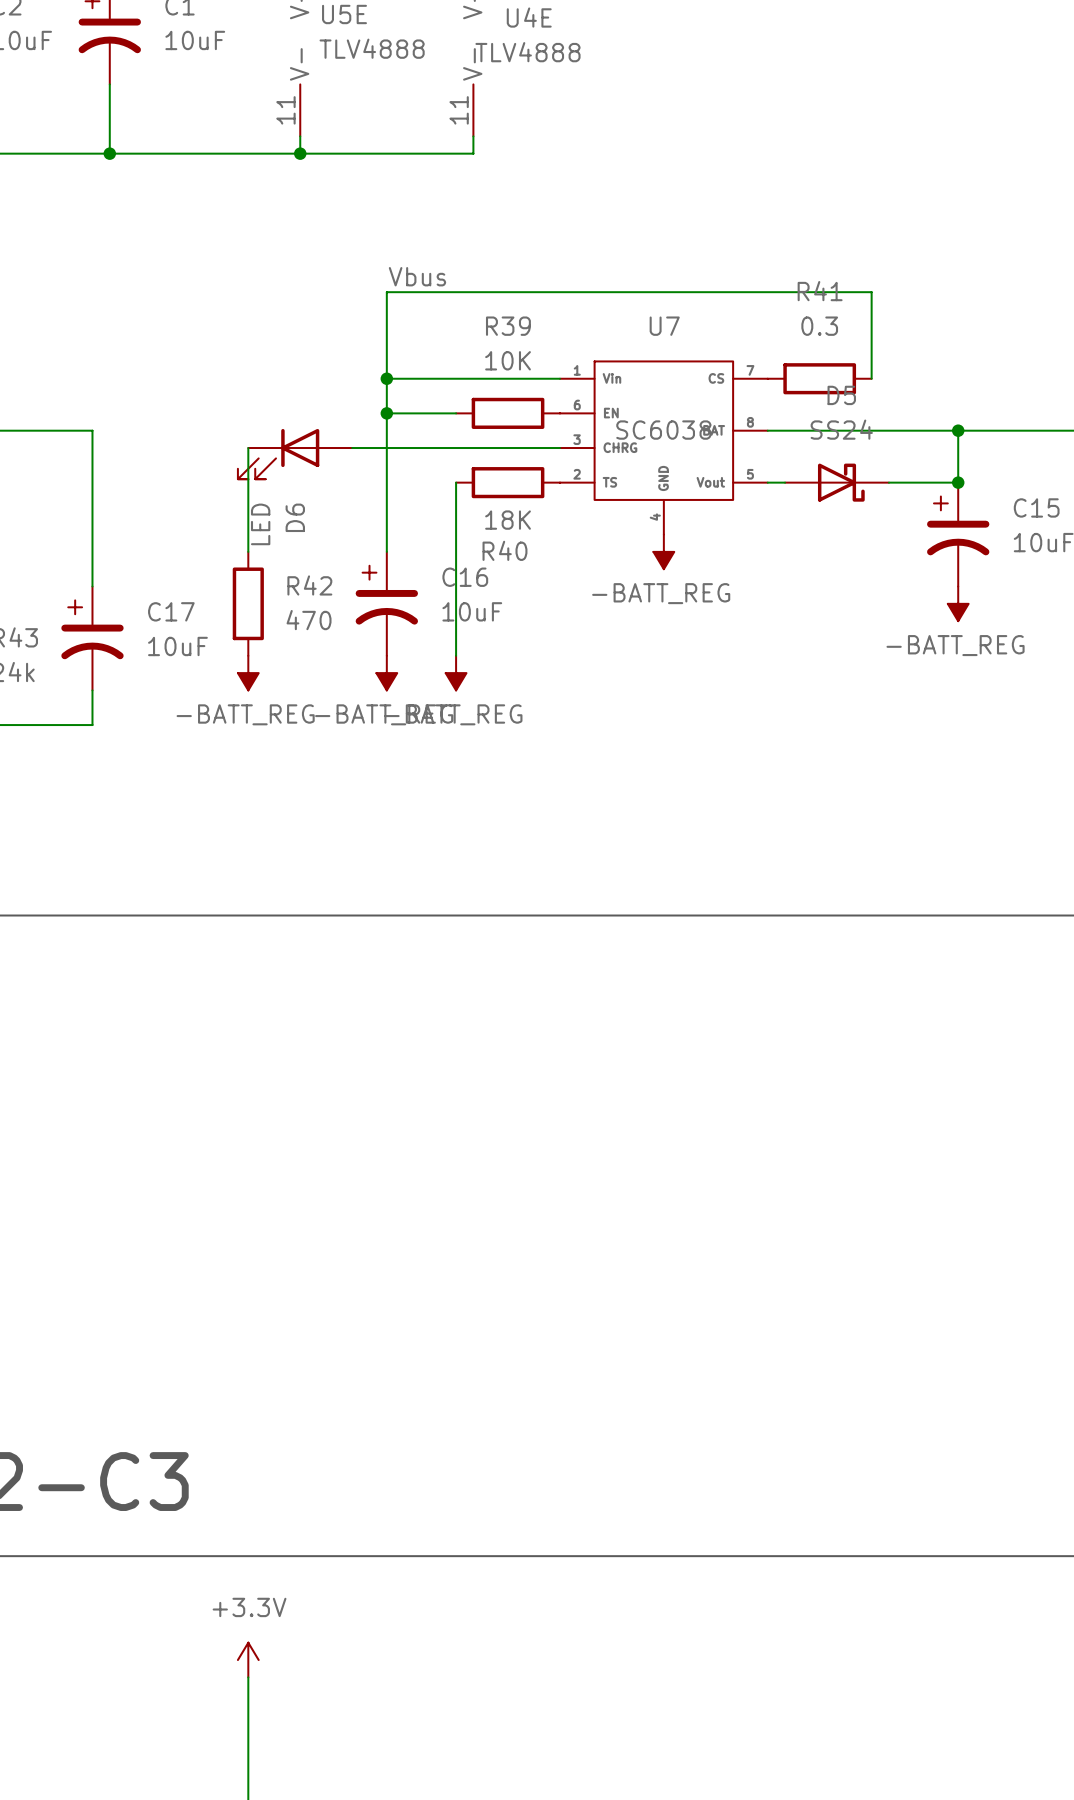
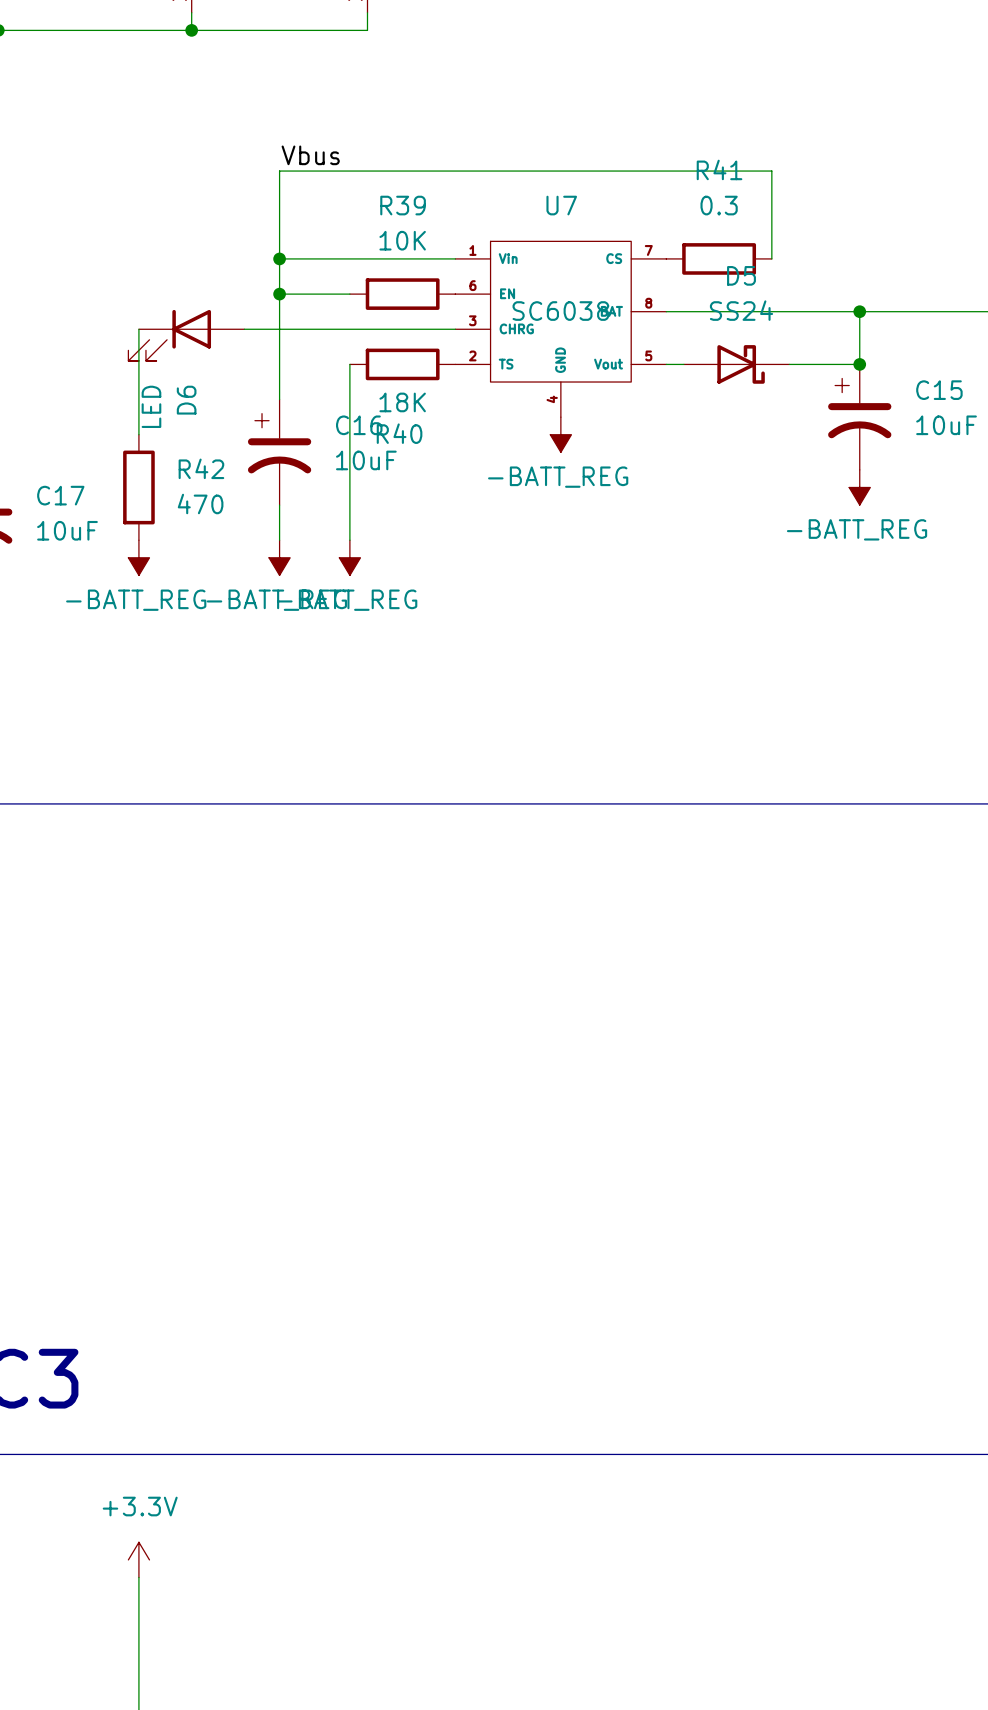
C16 position: (386, 603) -> (279, 452)

